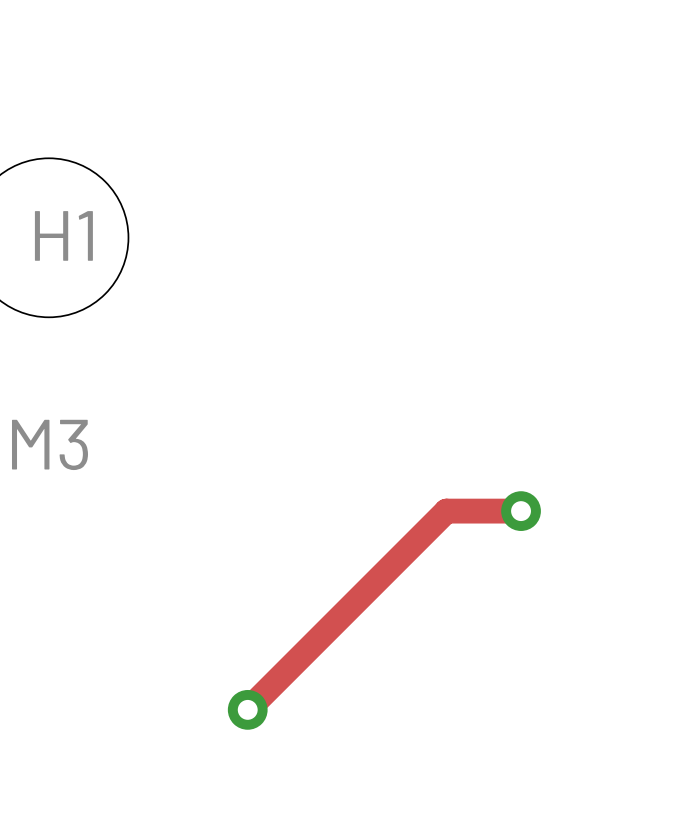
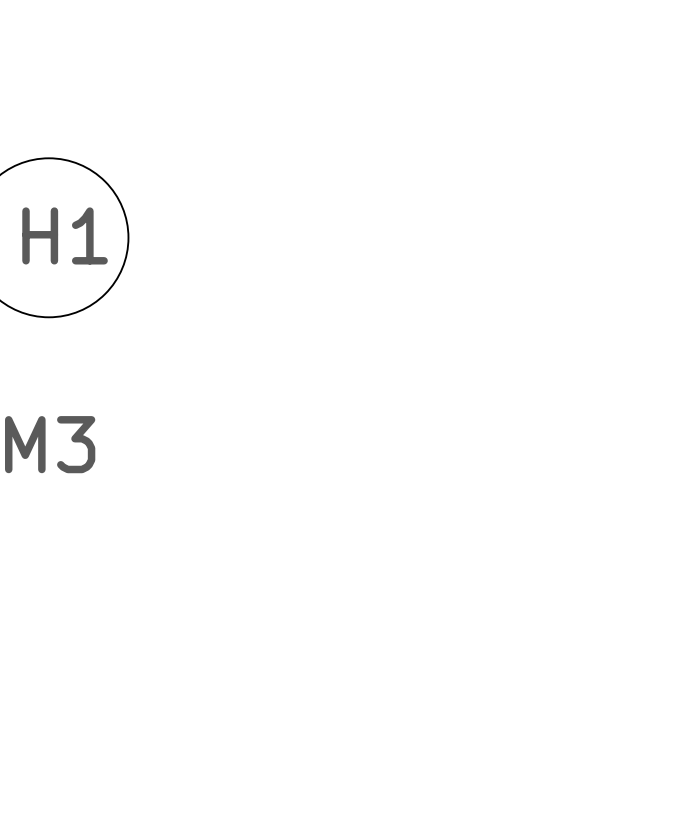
track: (521, 511) (446, 511) (247, 709) -> none
via: (521, 511) -> none
via: (247, 709) -> none

